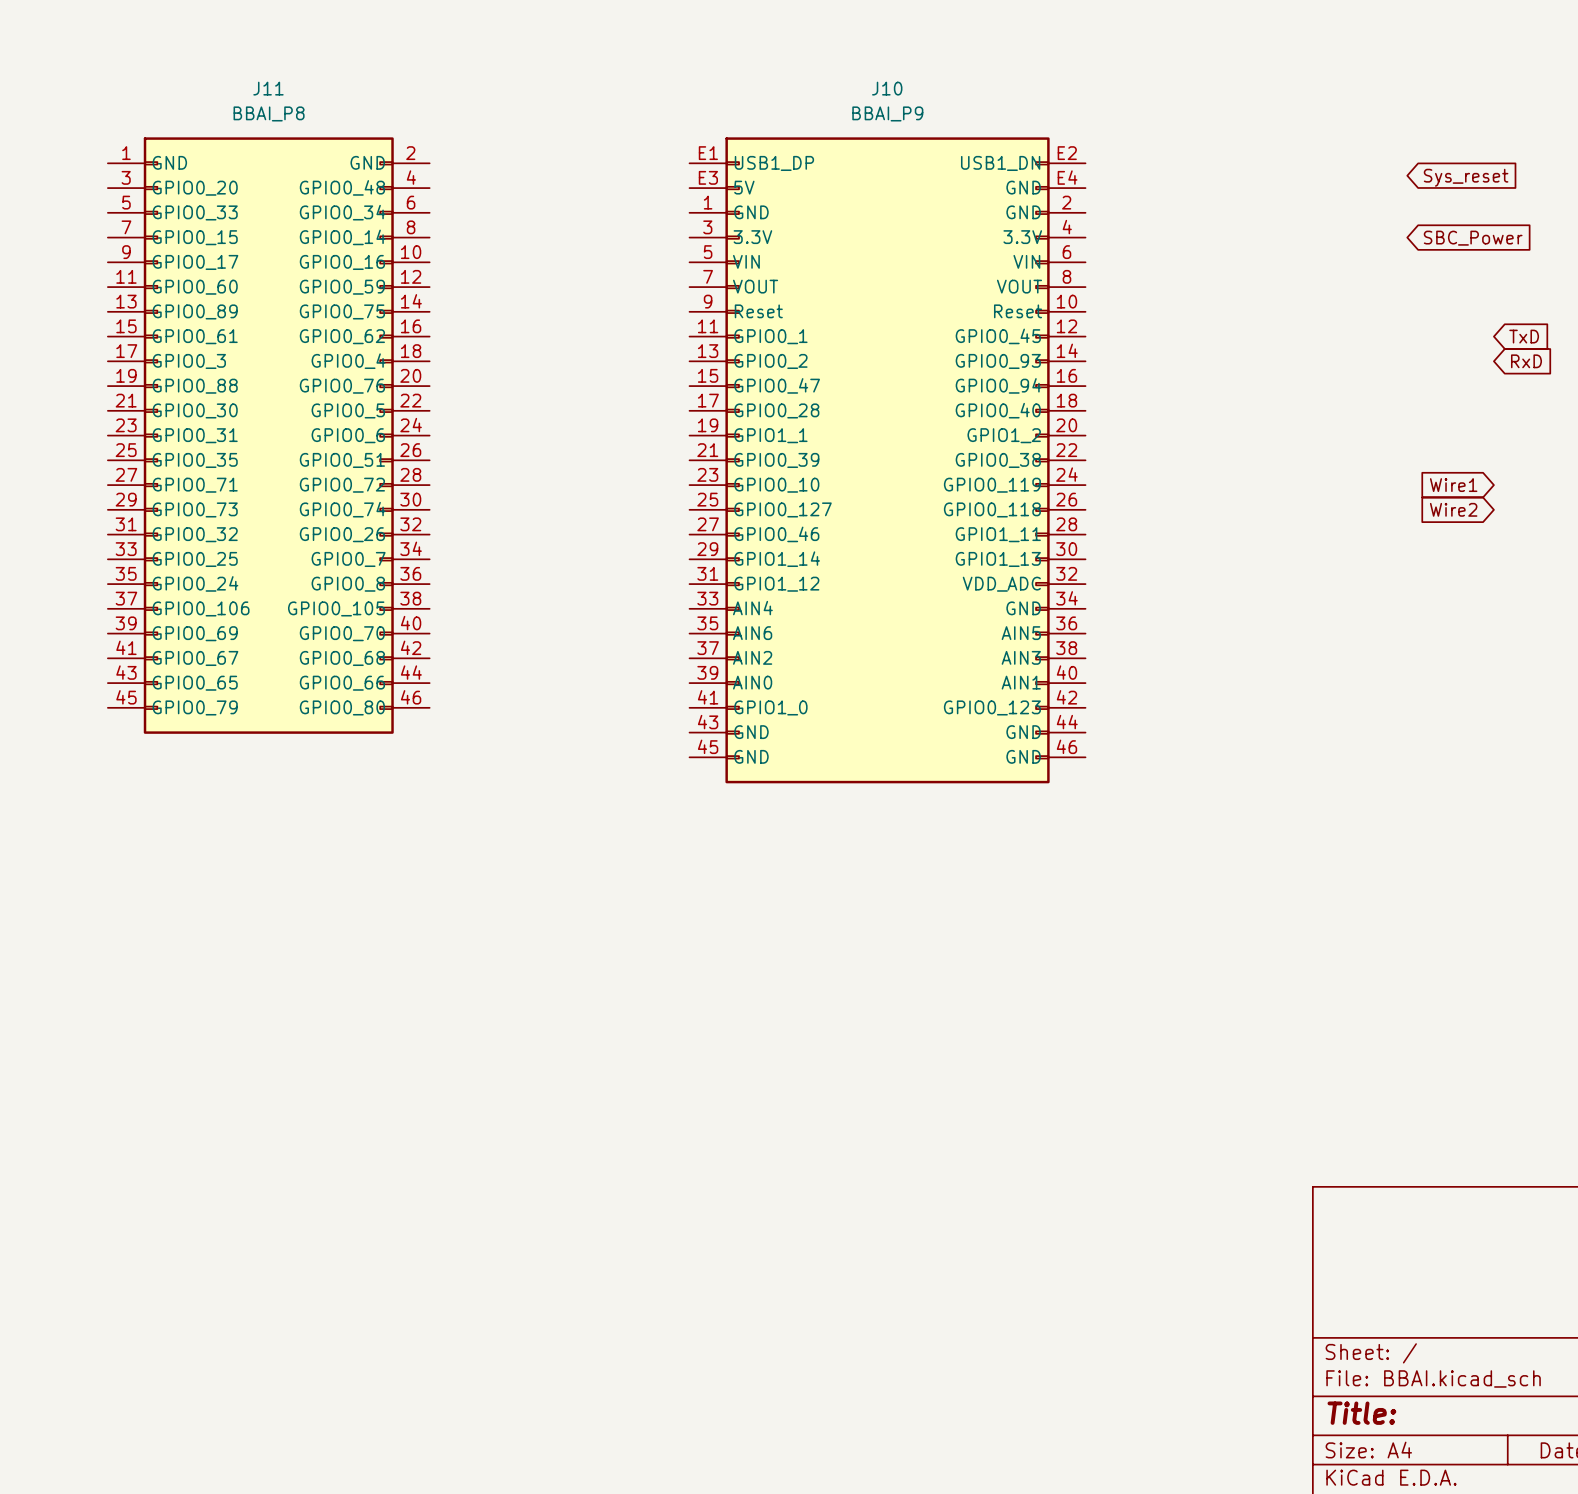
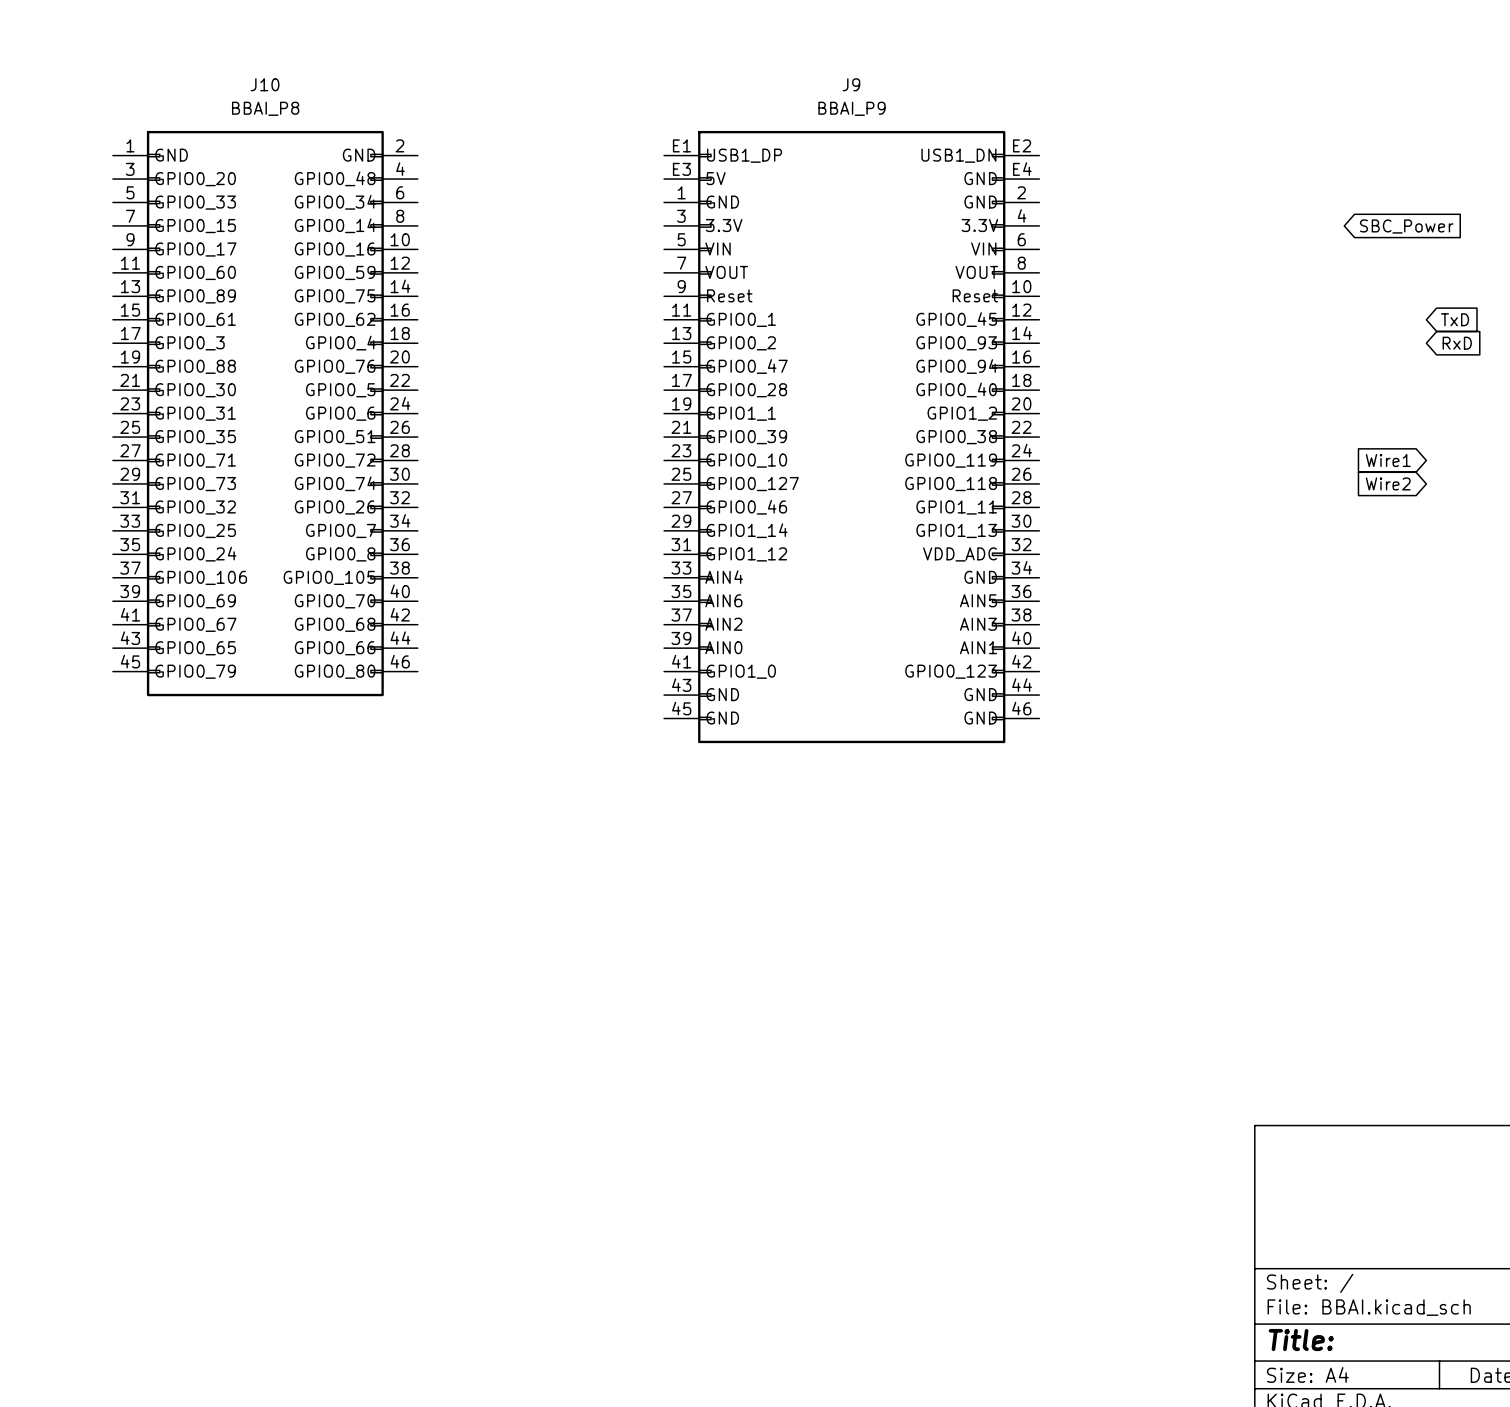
J11 name: J11 (268, 88) -> J10 (265, 84)
J10 name: J10 (887, 88) -> J9 (851, 84)
global label: Sys_reset (1466, 177) -> none

